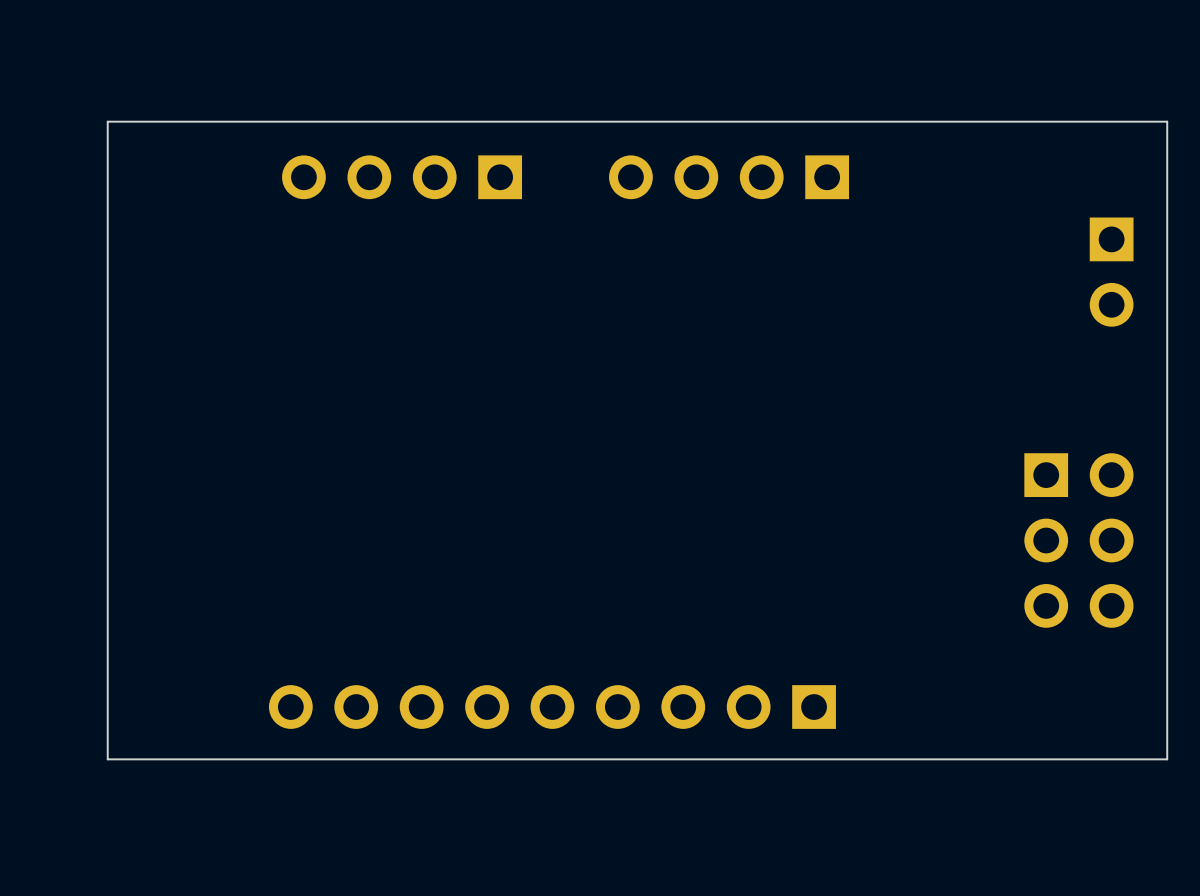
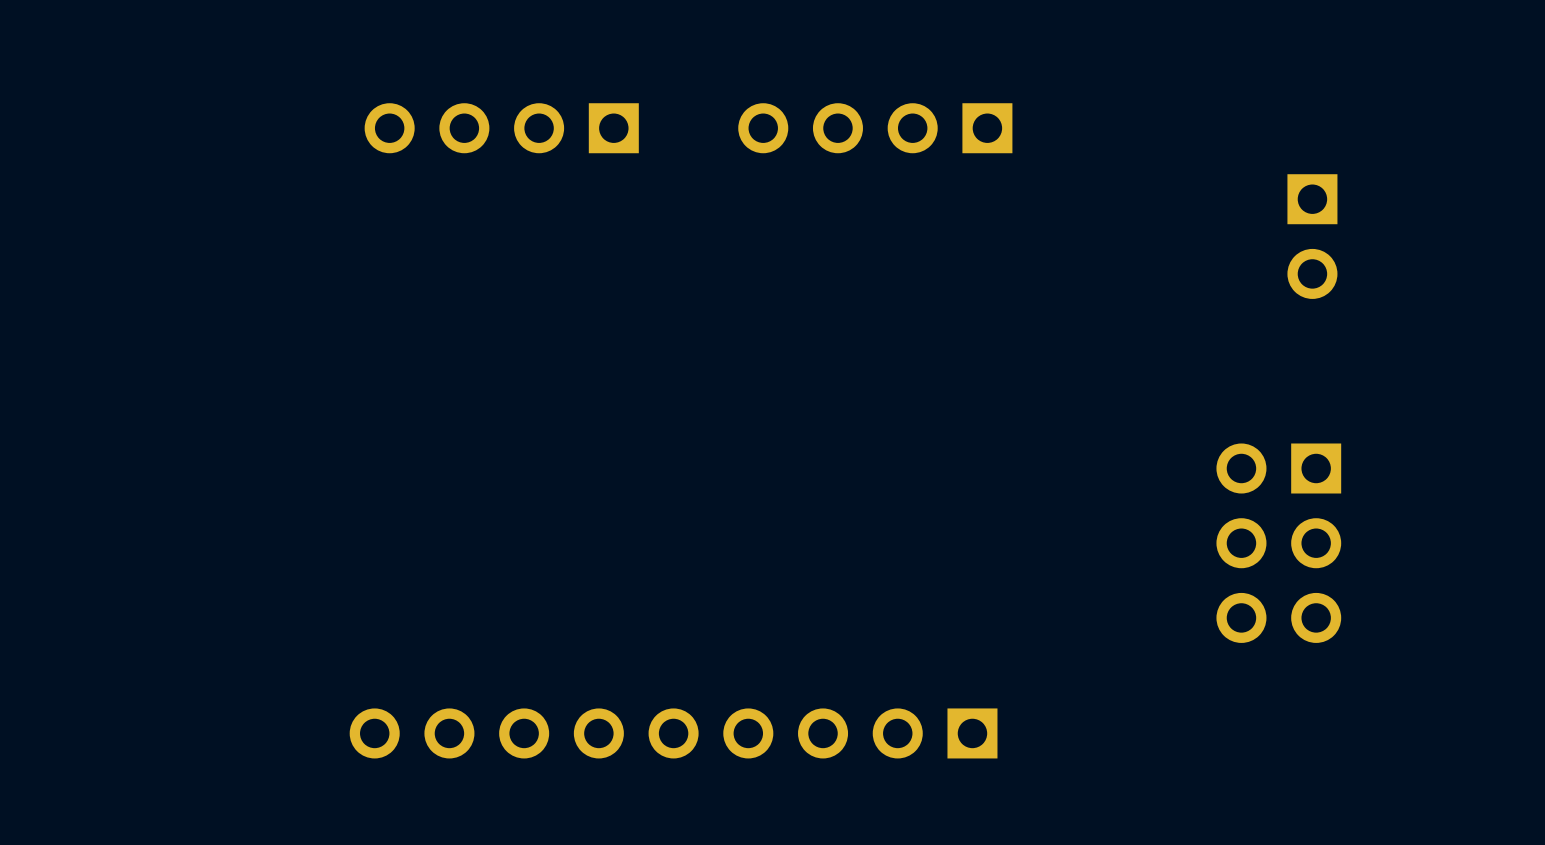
board edge: (1167, 121) (1167, 759) (107, 759) (107, 121) (1167, 121) -> none
part footprint: [1024, 453, 1134, 628] -> [1216, 443, 1342, 643]

